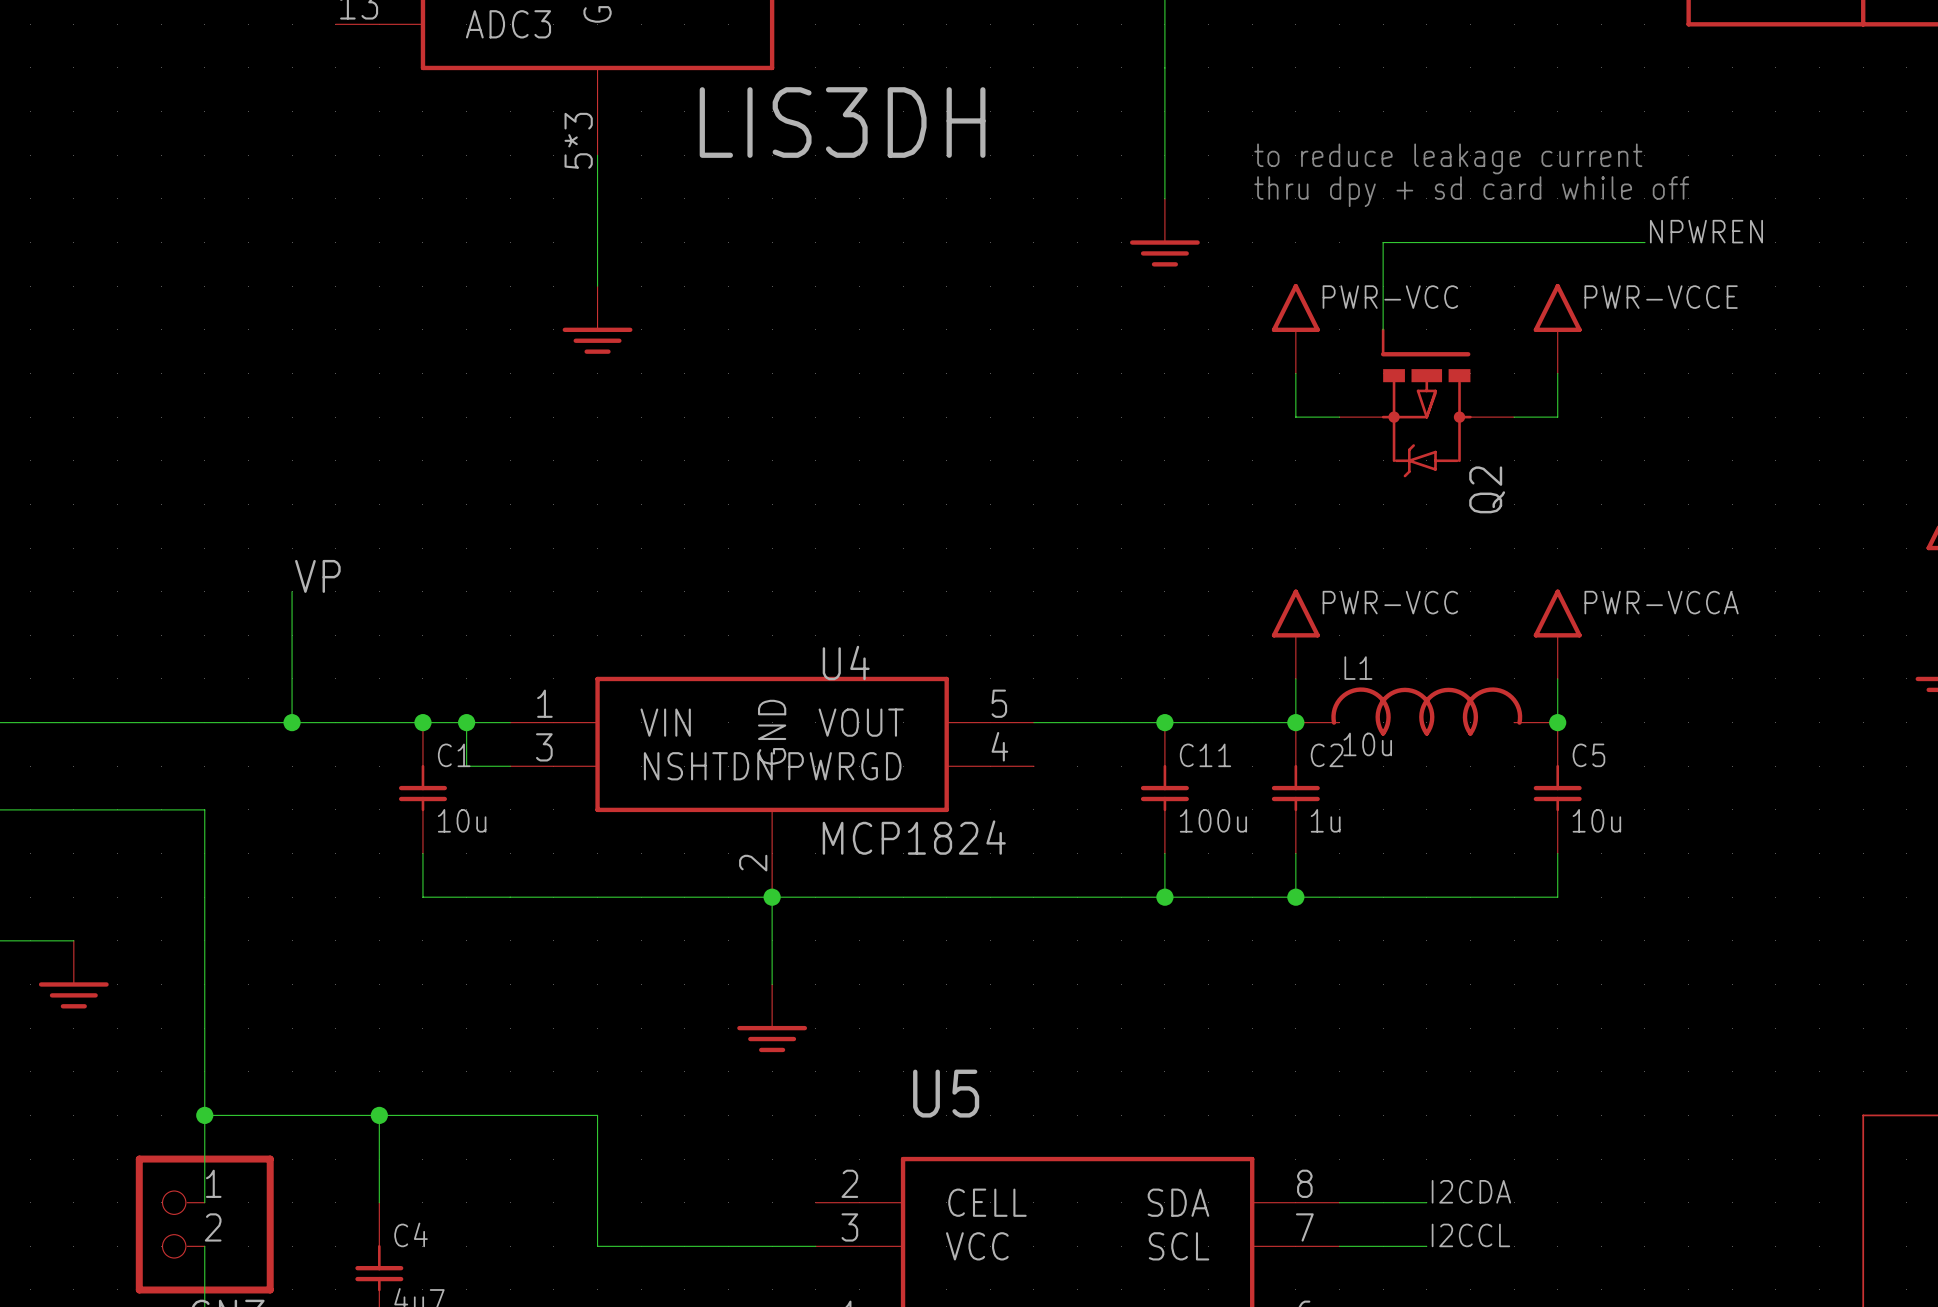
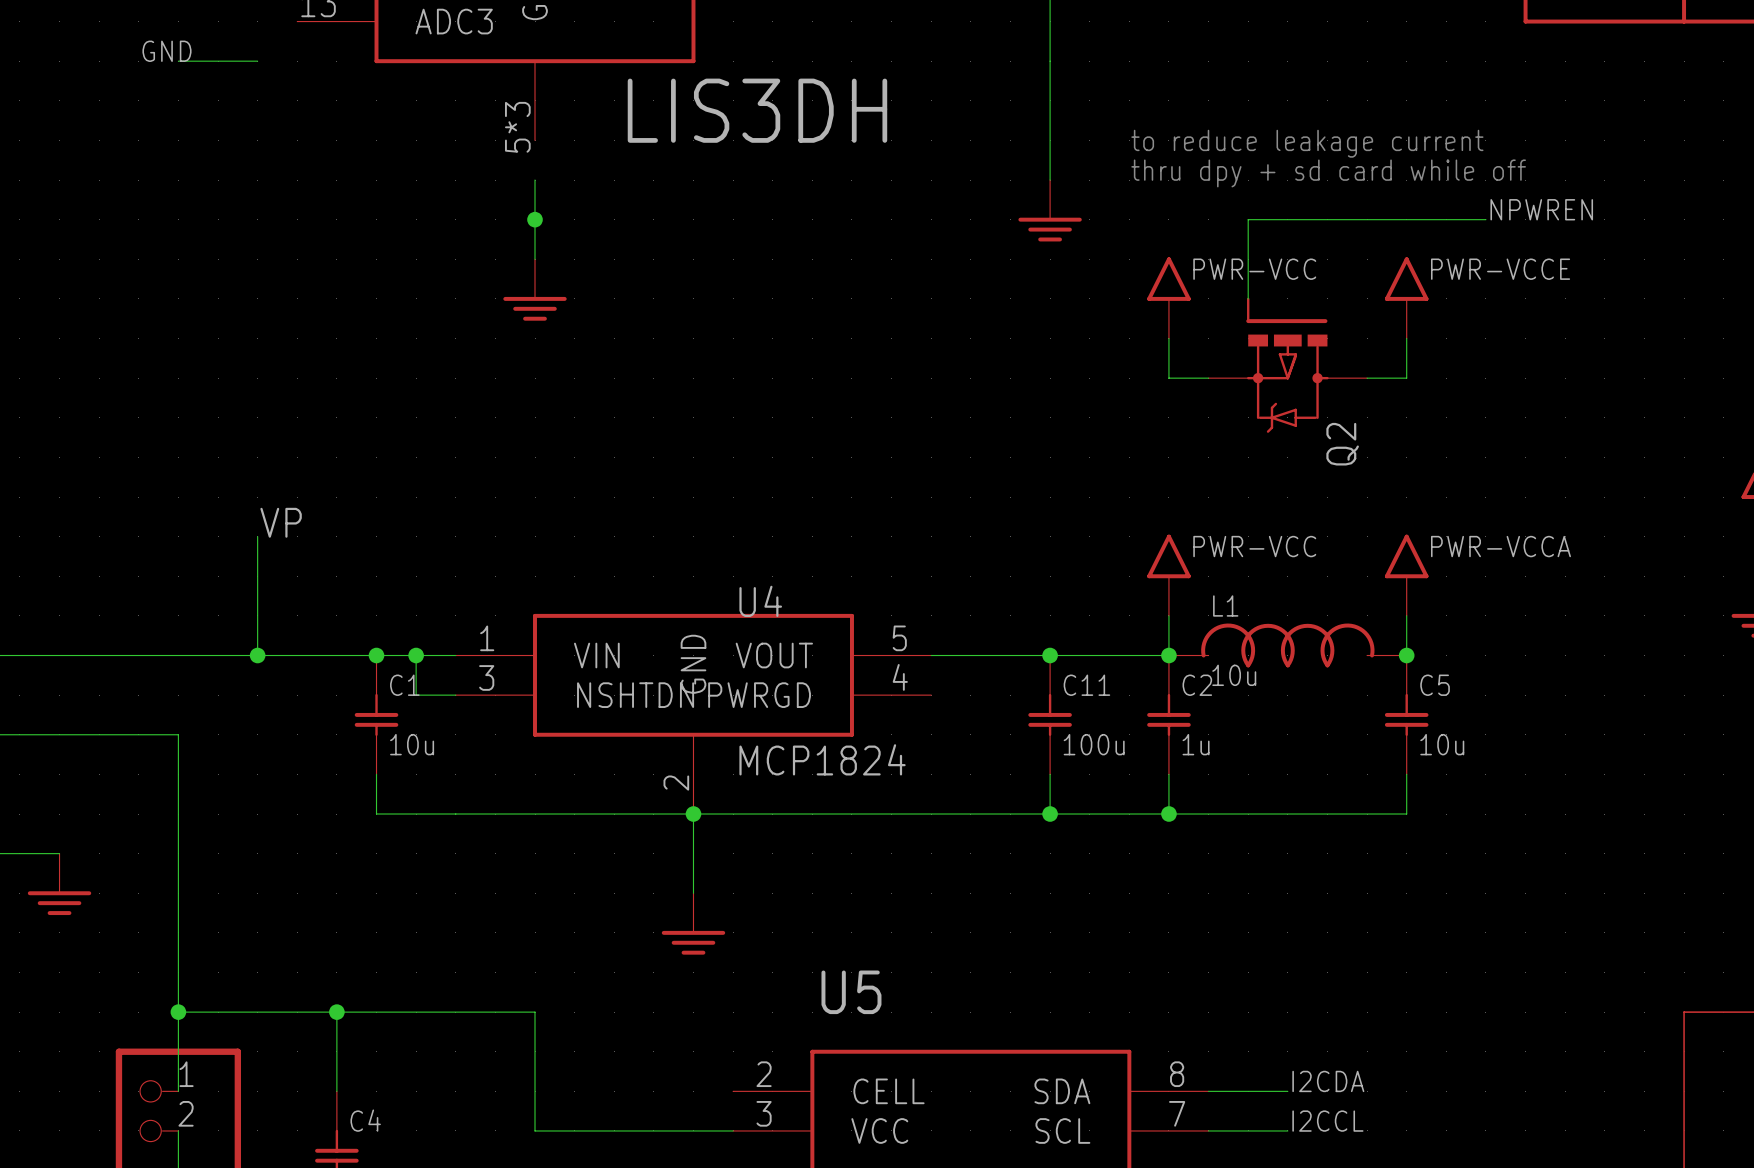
label: none -> GND (166, 51)
wire: none -> (178, 61) (257, 61)
wire: (597, 155) (597, 198) -> none
junction: none -> (535, 219)

